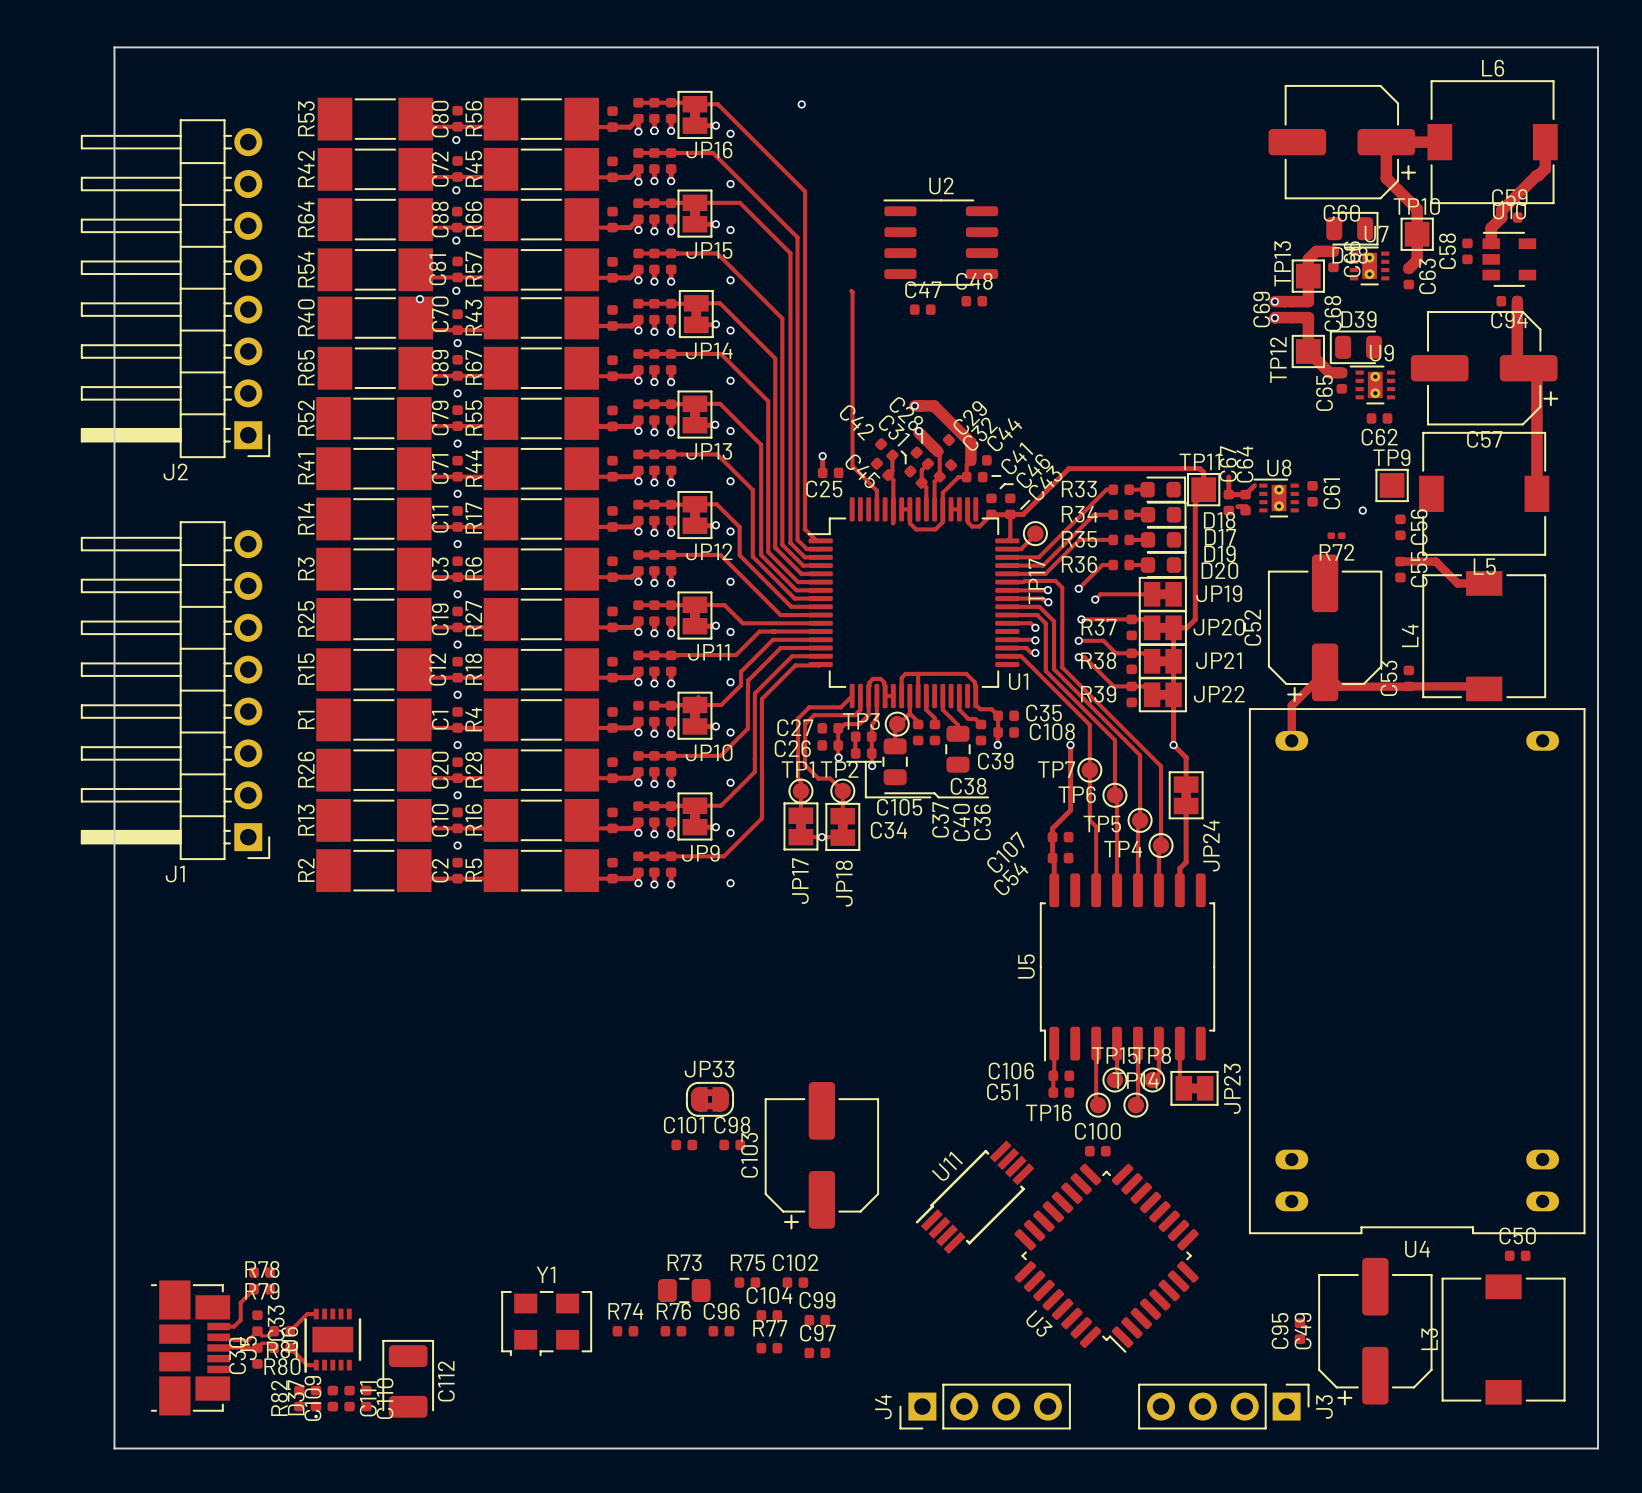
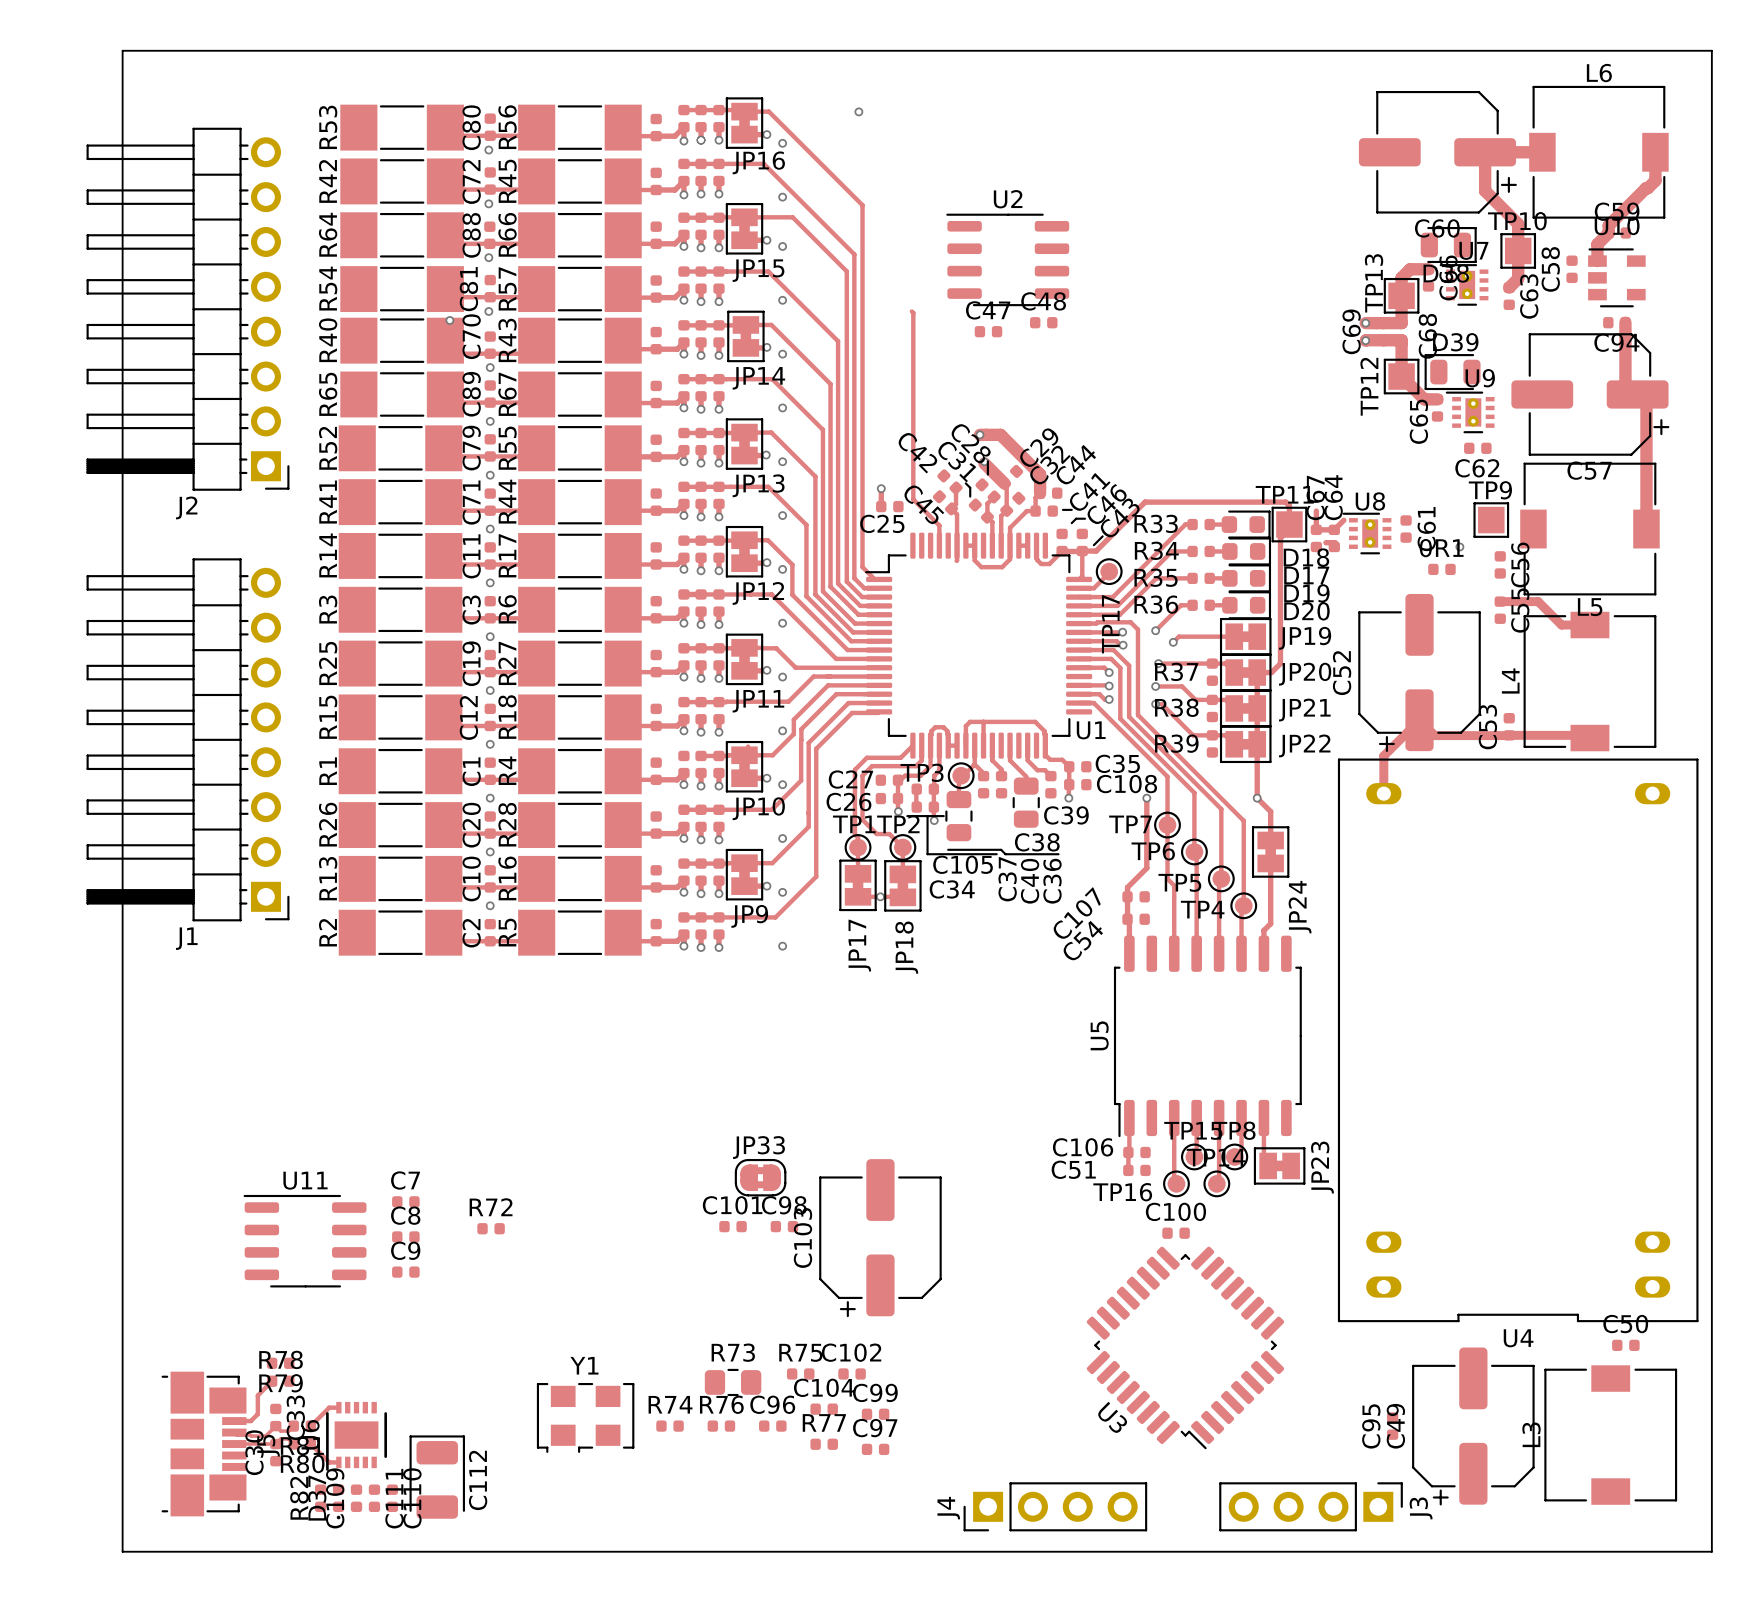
0R1: none -> (1441, 569)
R72 footprint: [1327, 532, 1346, 540] -> [477, 1223, 505, 1235]
R72 name position: R72 (1336, 552) -> R72 (491, 1207)
C7: none -> (405, 1201)
U11 footprint: [915, 1140, 1035, 1255] -> [243, 1194, 367, 1288]
C8: none -> (405, 1236)
U11 name position: U11 (947, 1166) -> U11 (305, 1180)
C9: none -> (405, 1272)

